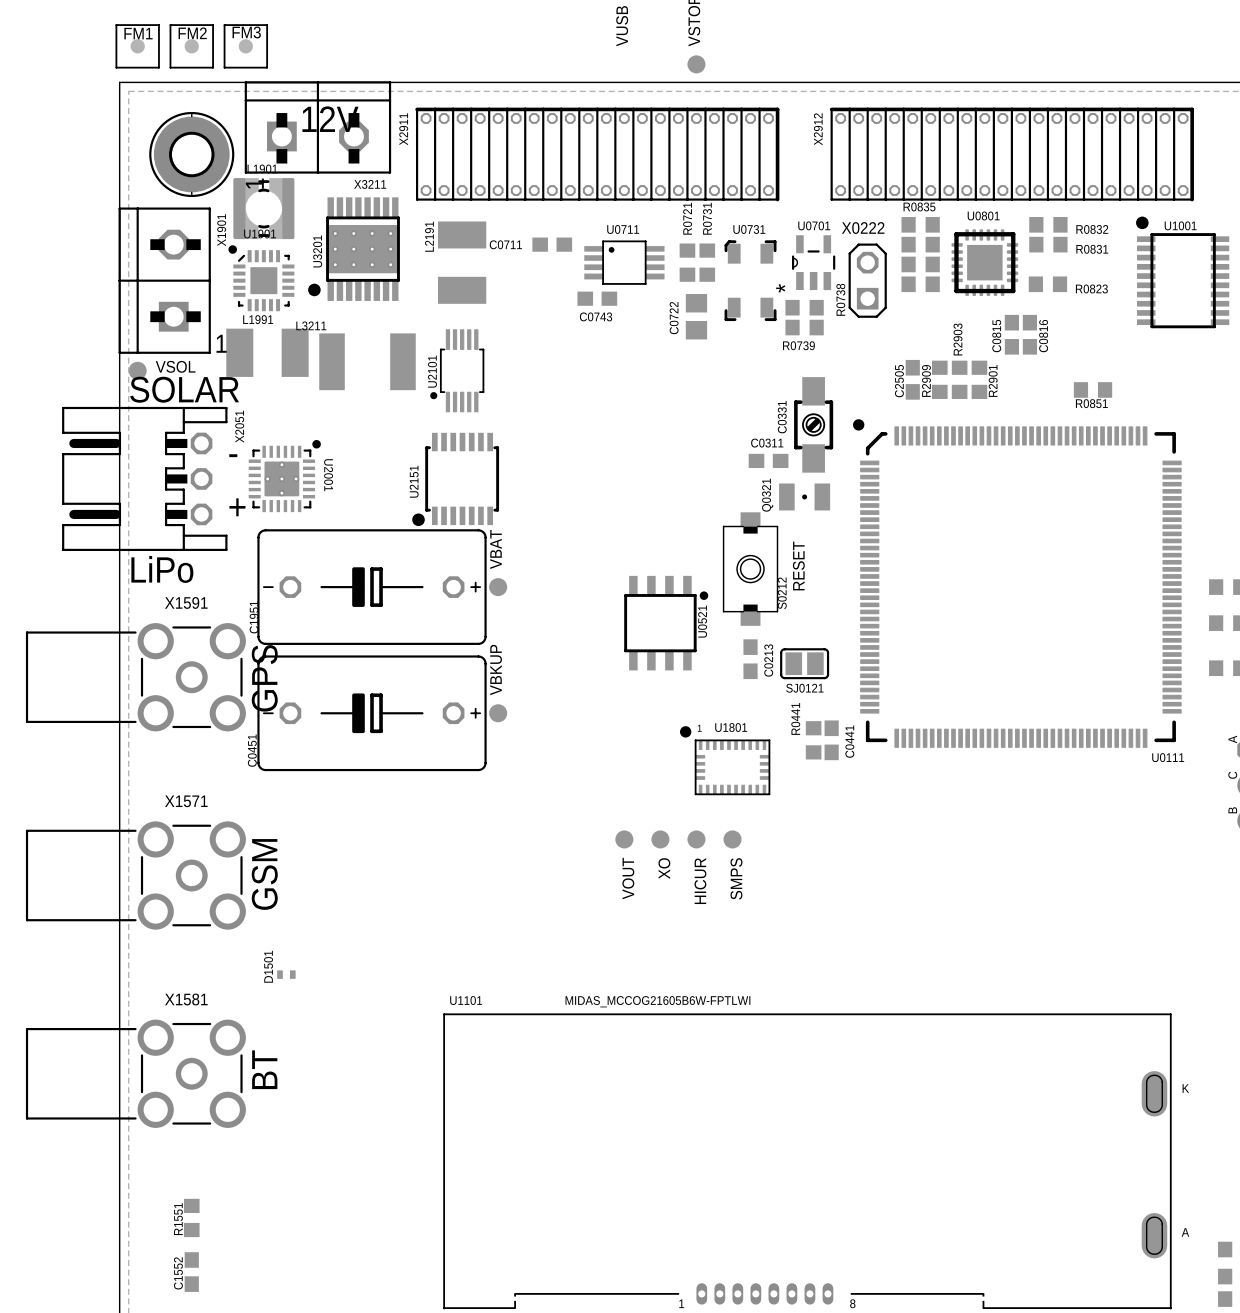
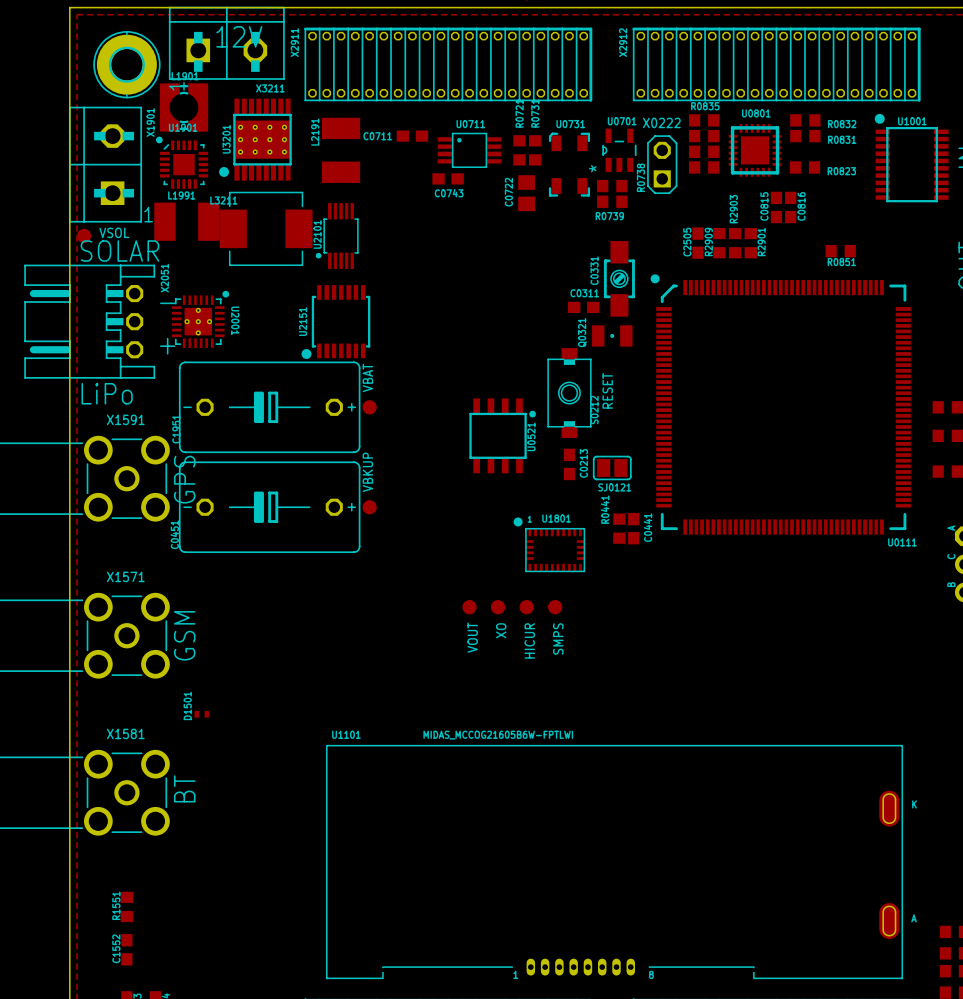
L3211 footprint: [319, 333, 416, 391] -> [219, 191, 313, 266]

